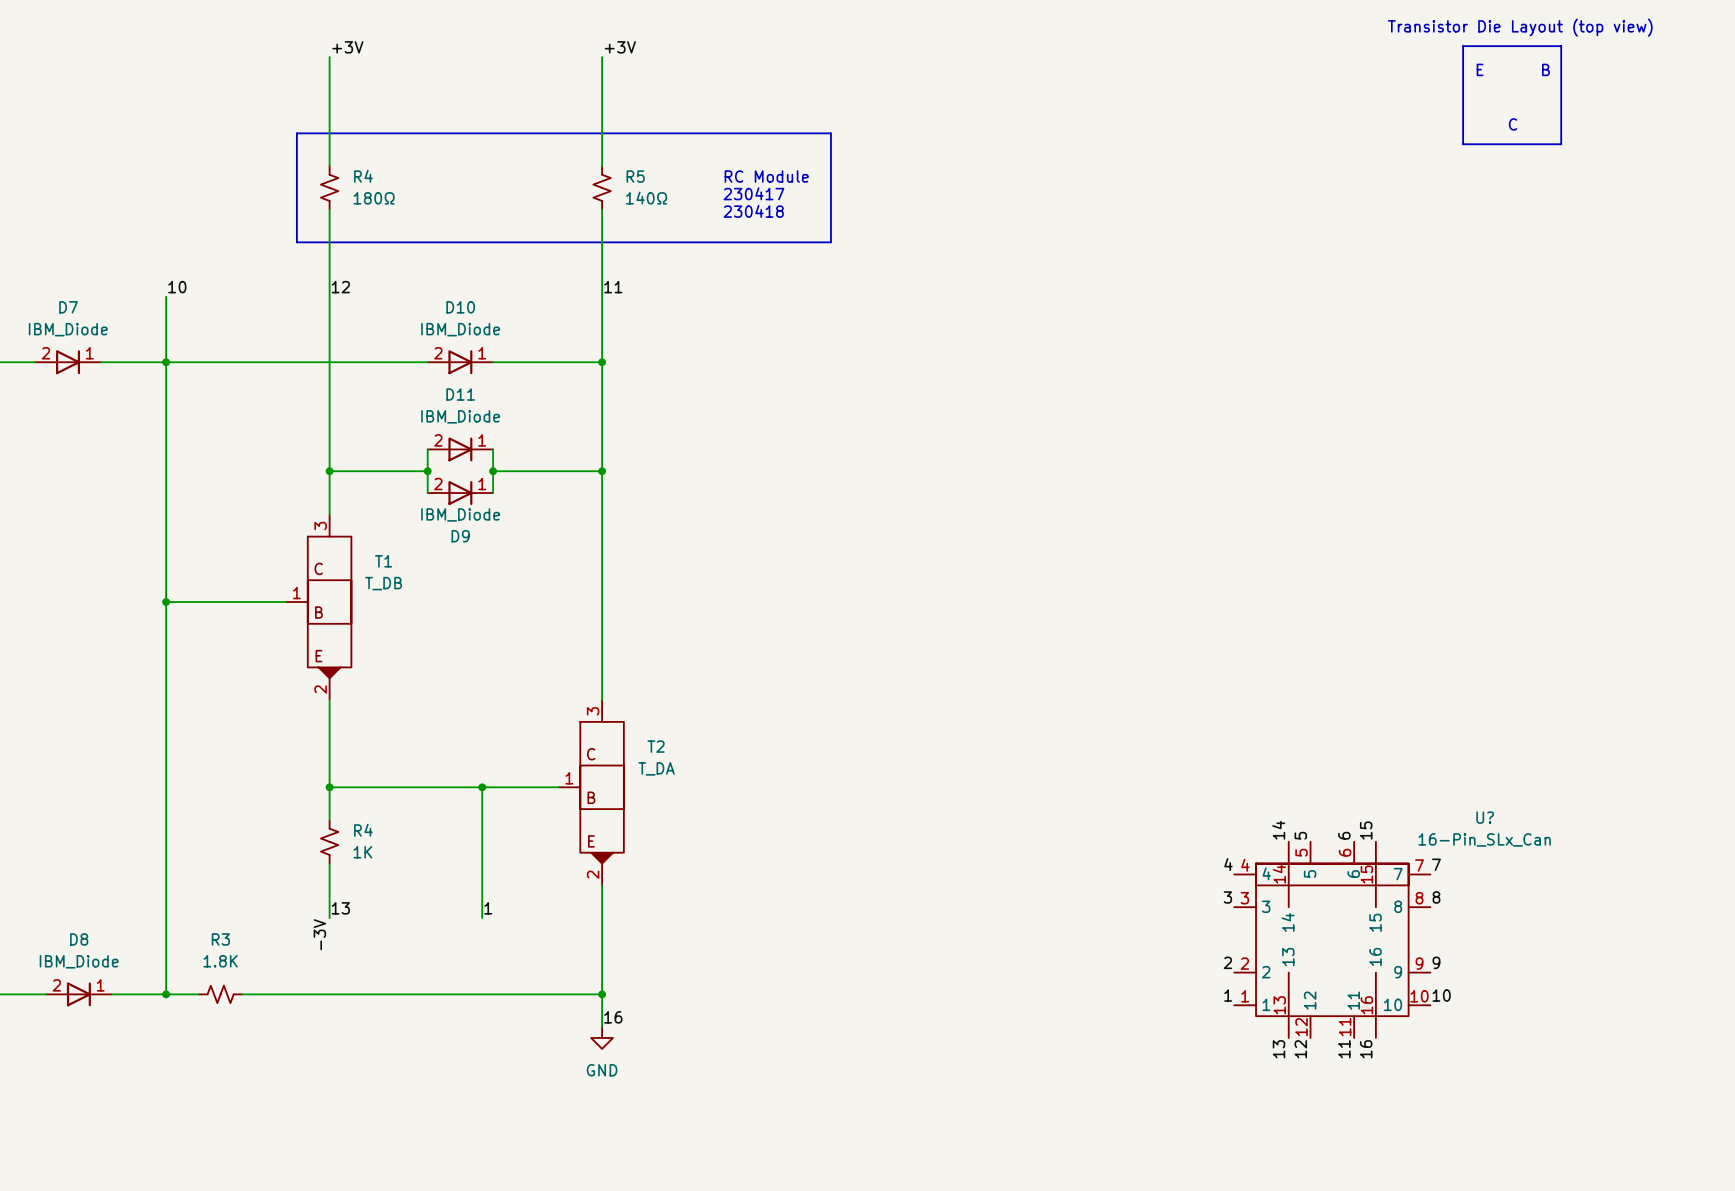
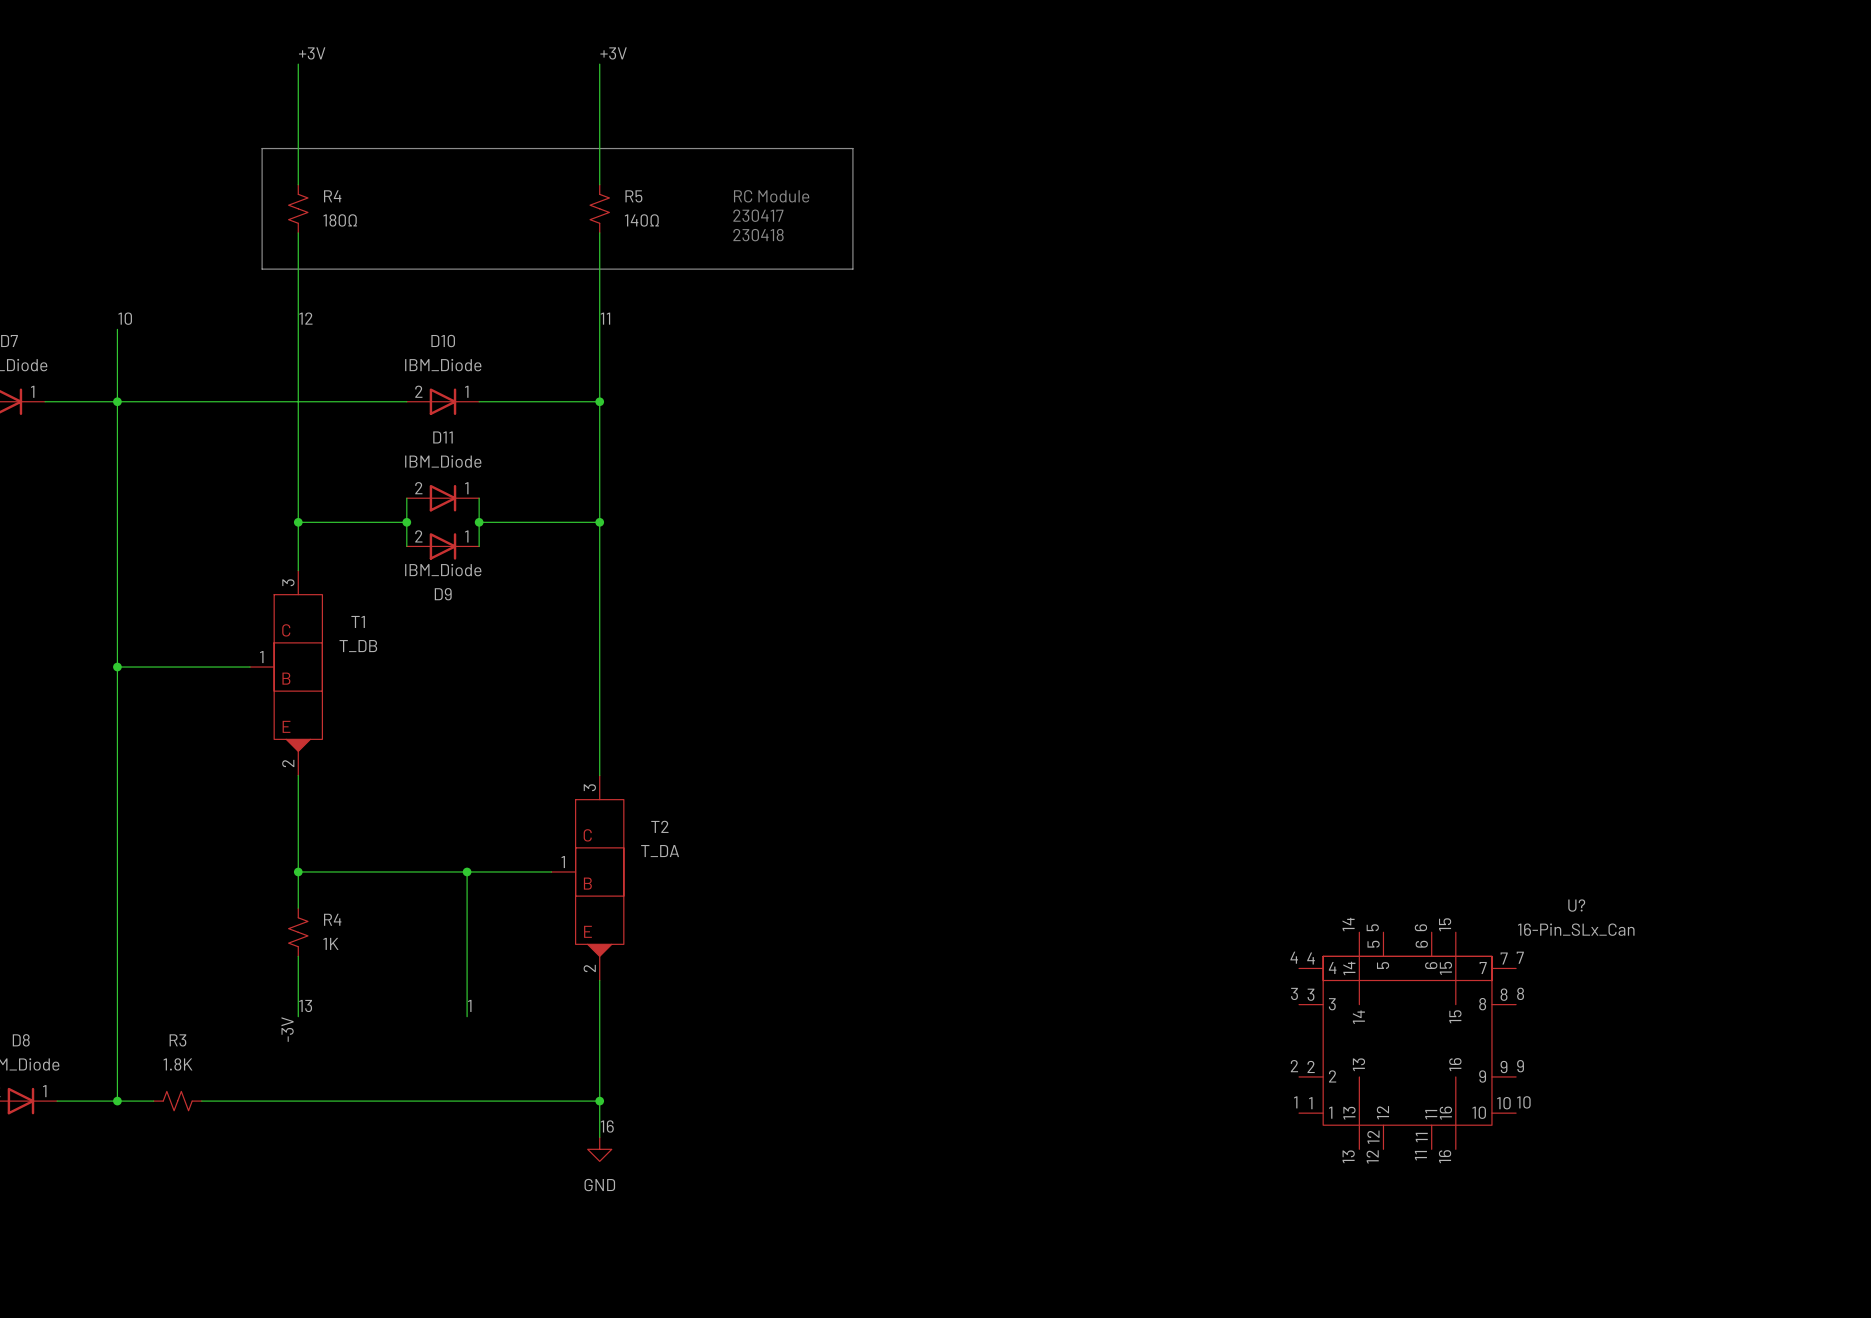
text: Transistor Die Layout (top view) (1520, 27) -> none
line: (1463, 46) (1463, 144) (1561, 144) (1561, 46) (1463, 46) -> none
text: E (1480, 69) -> none
text: B (1545, 69) -> none
text: C (1513, 124) -> none

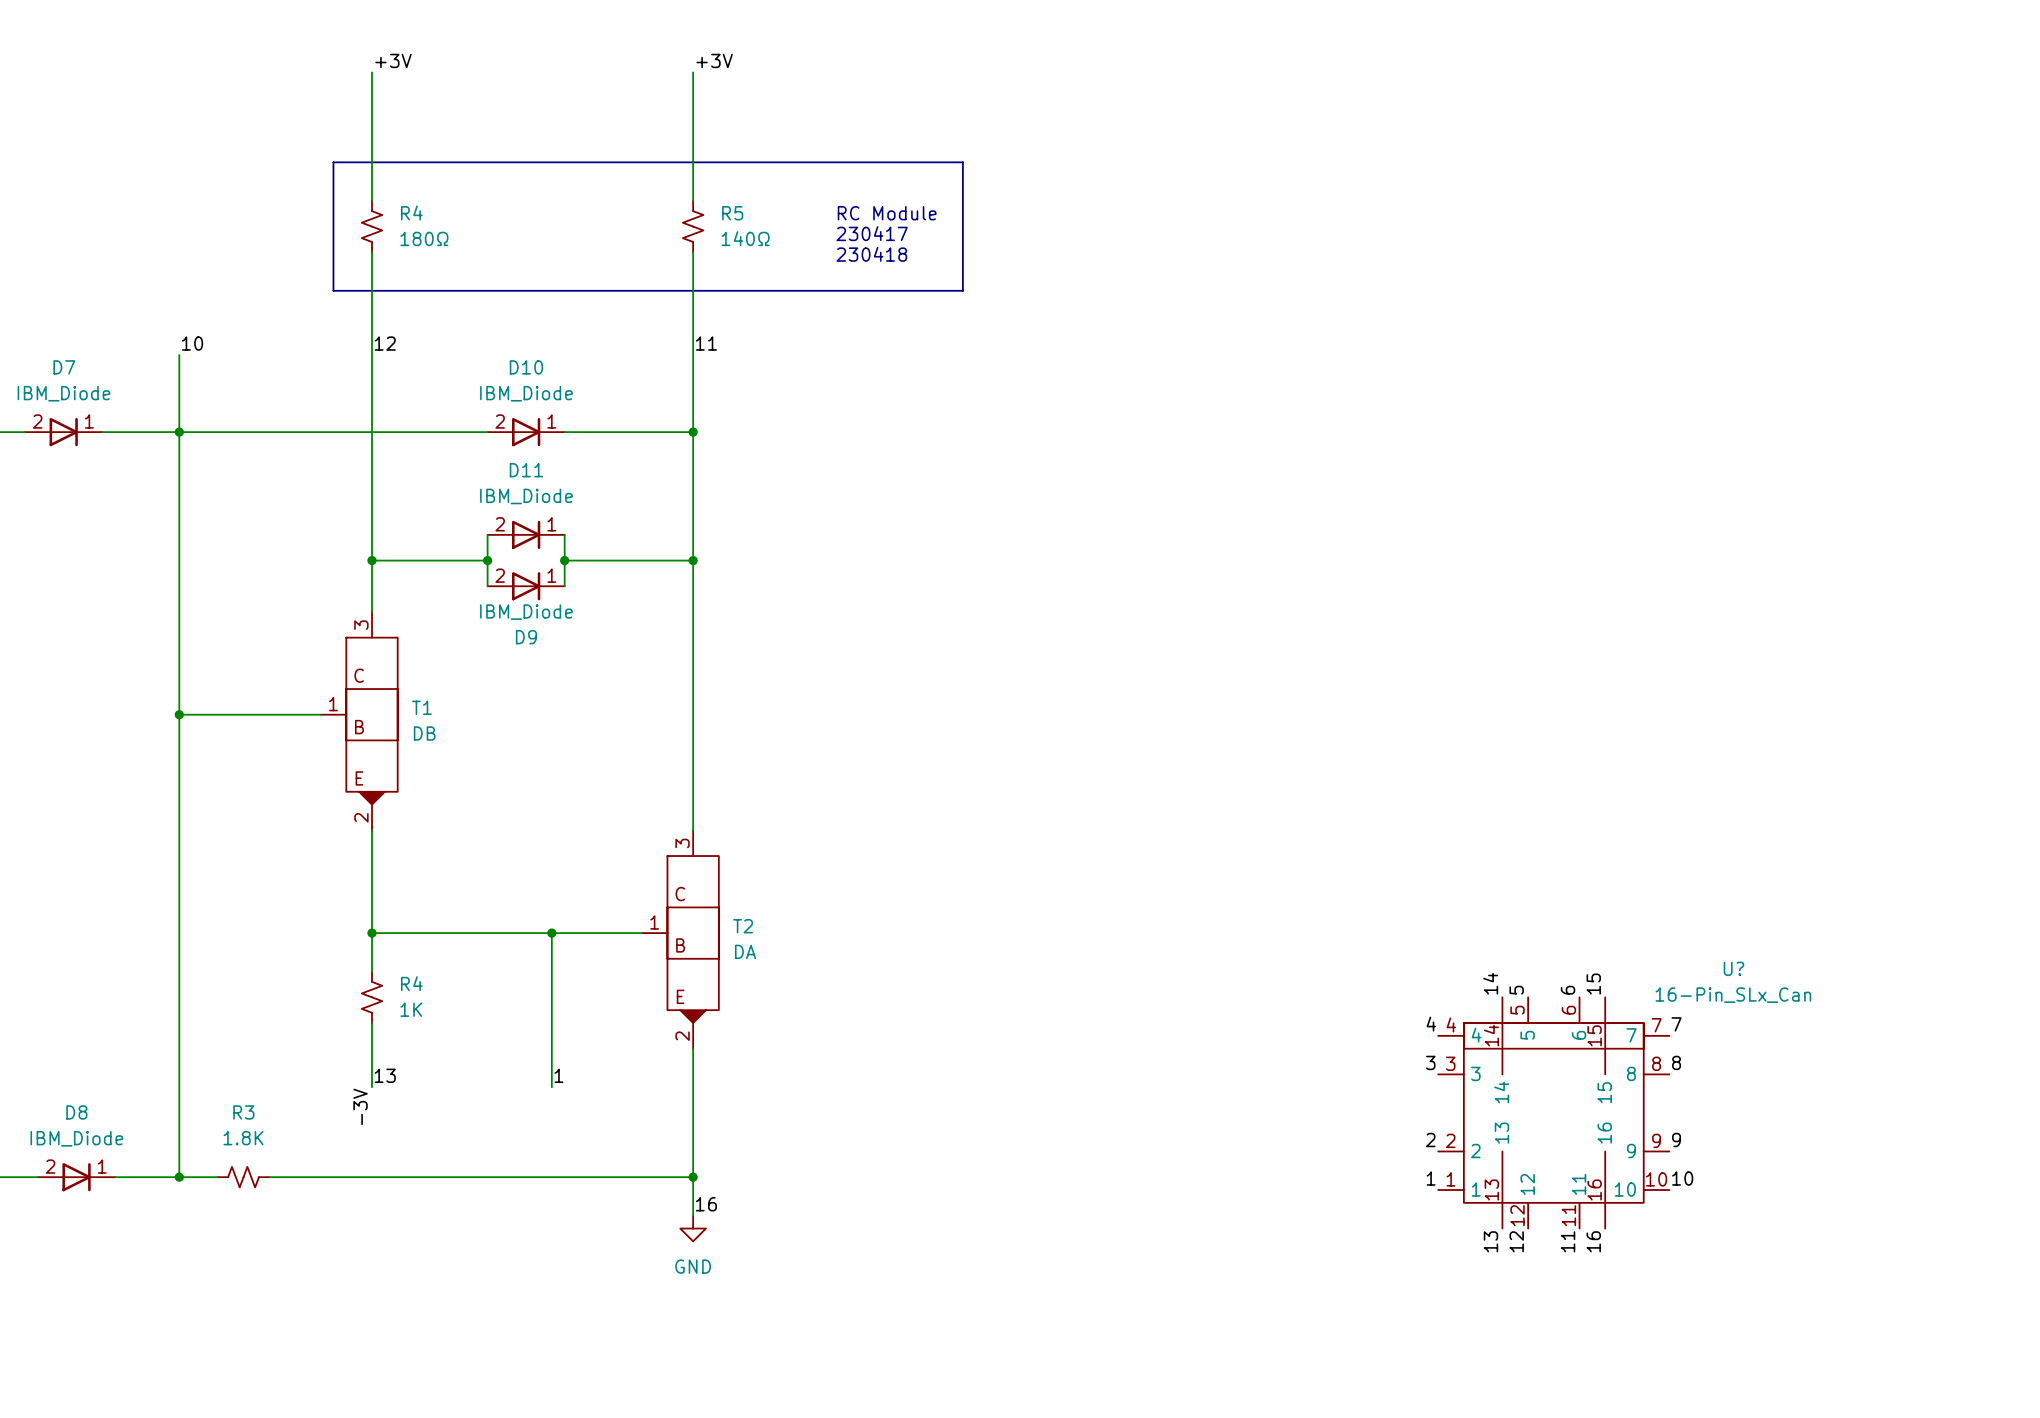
T1 name position: T1 (358, 621) -> T1 (421, 707)
T1 value: T_DB (358, 646) -> DB (424, 733)
T2 name position: T2 (659, 826) -> T2 (743, 926)
T2 value: T_DA (660, 851) -> DA (745, 951)

